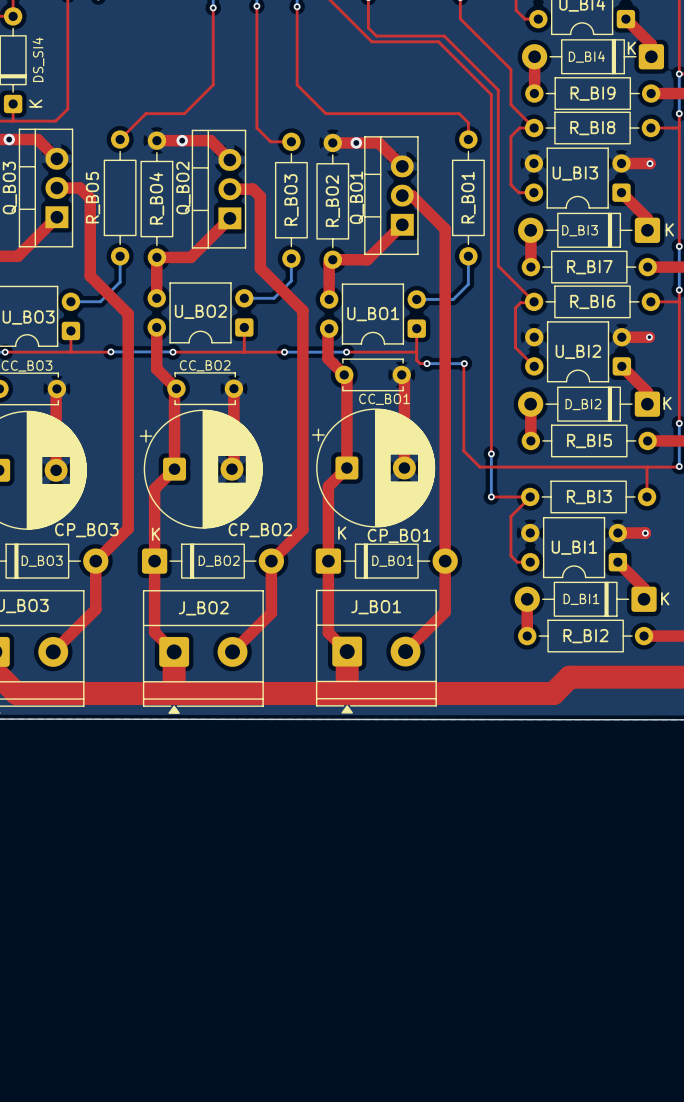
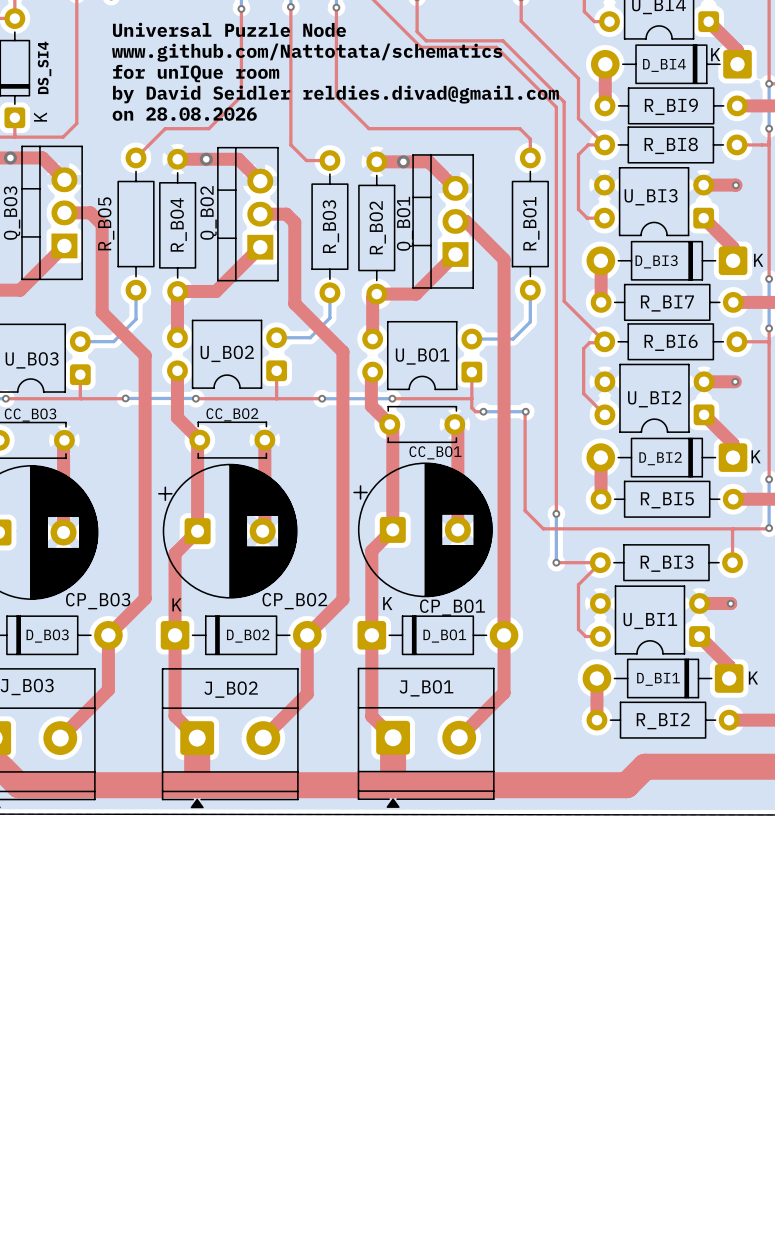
text: none -> Universal Puzzle Node (229, 29)
text: none -> www.github.com/Nattotata/schematics (307, 52)
text: none -> for unIQue room (196, 73)
text: none -> by David Seidler reldies.divad@gmail.com (335, 94)
text: none -> on 28.08.2026 (184, 114)

